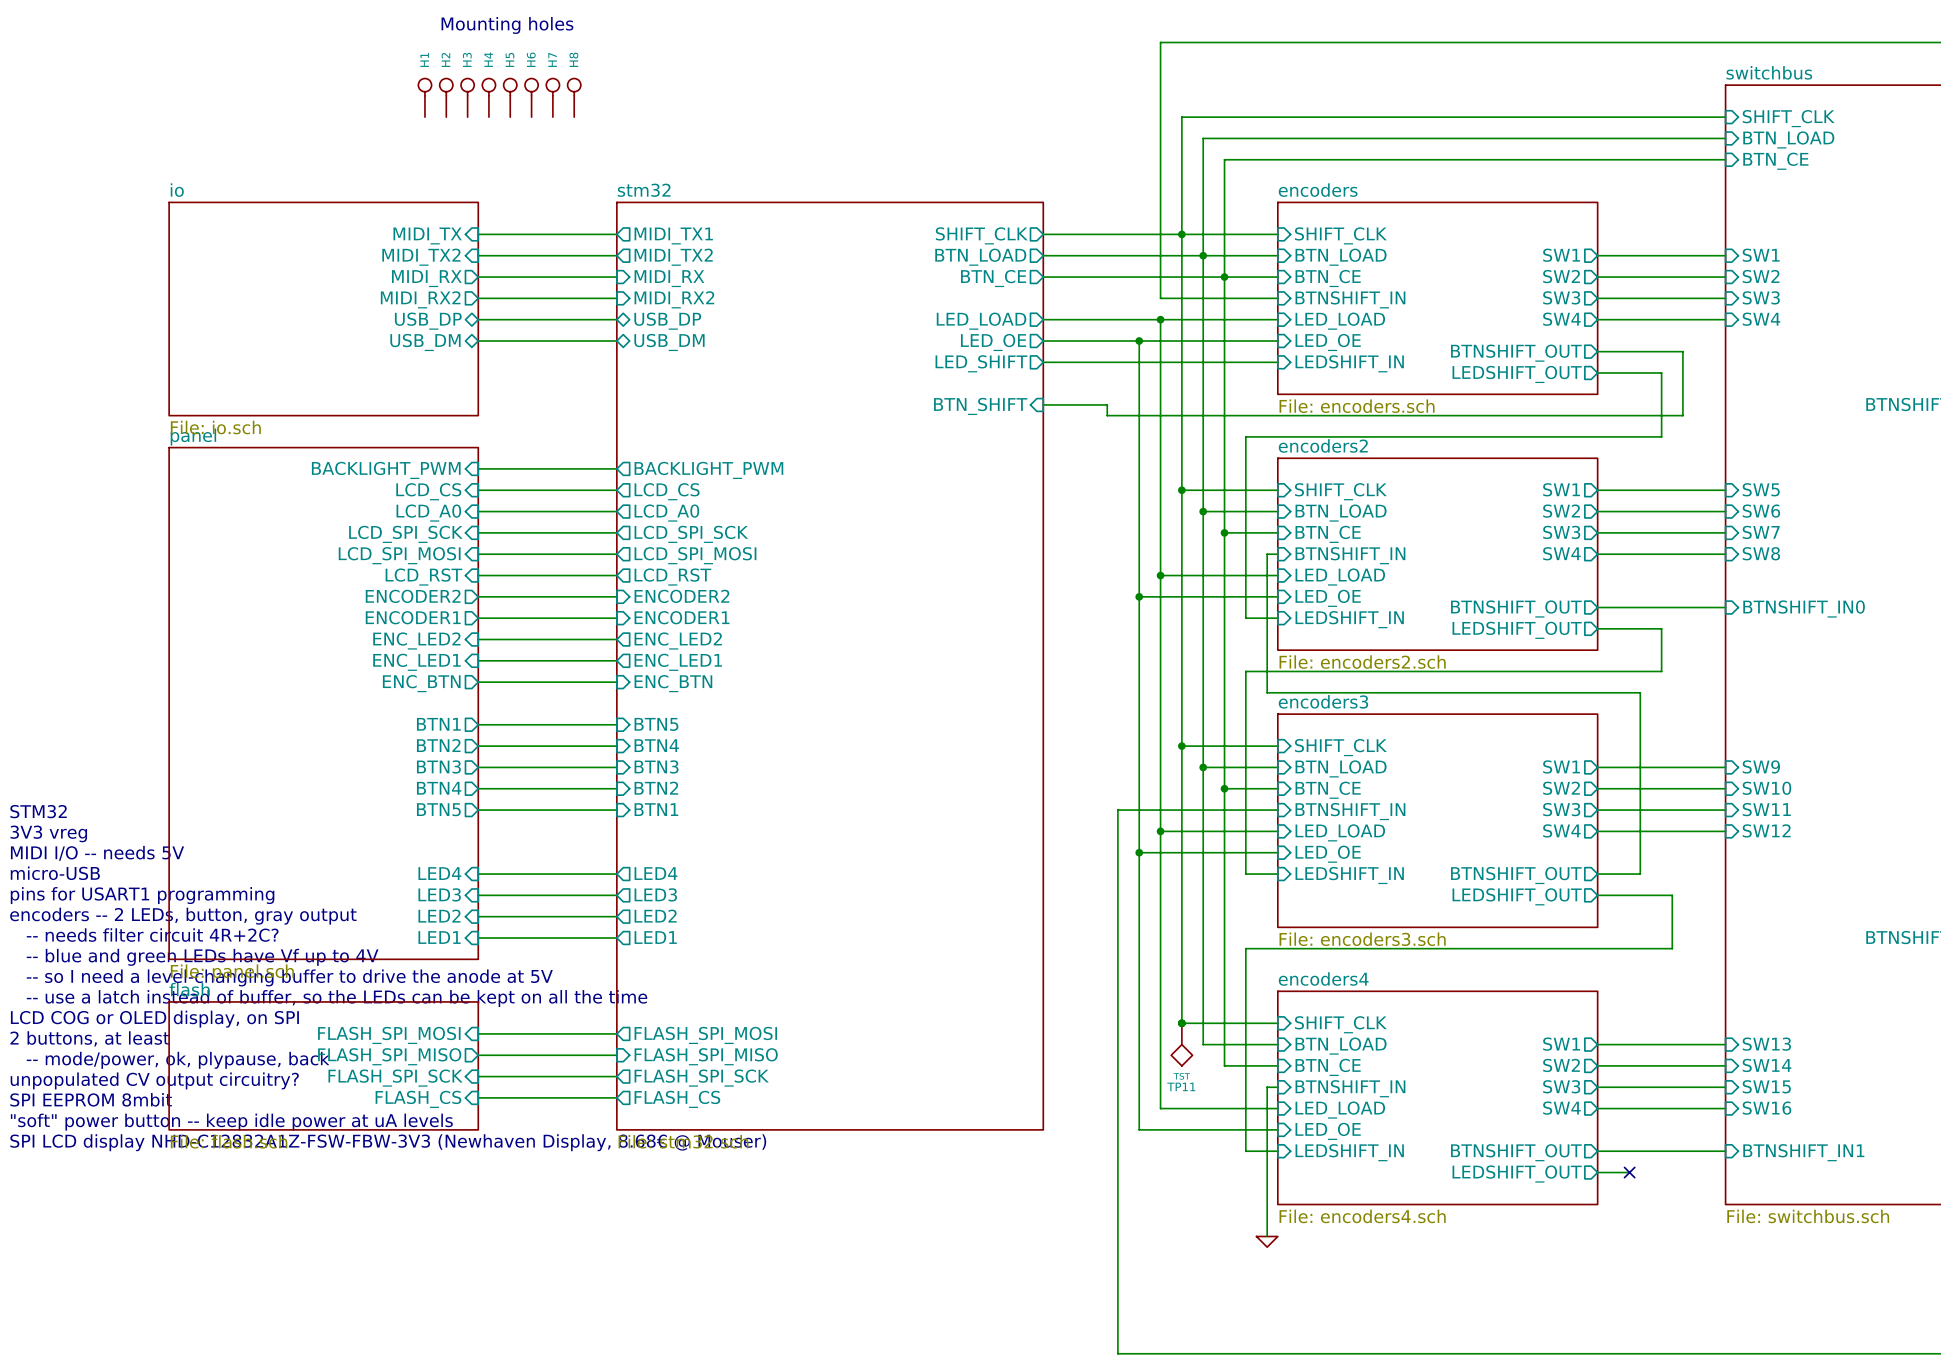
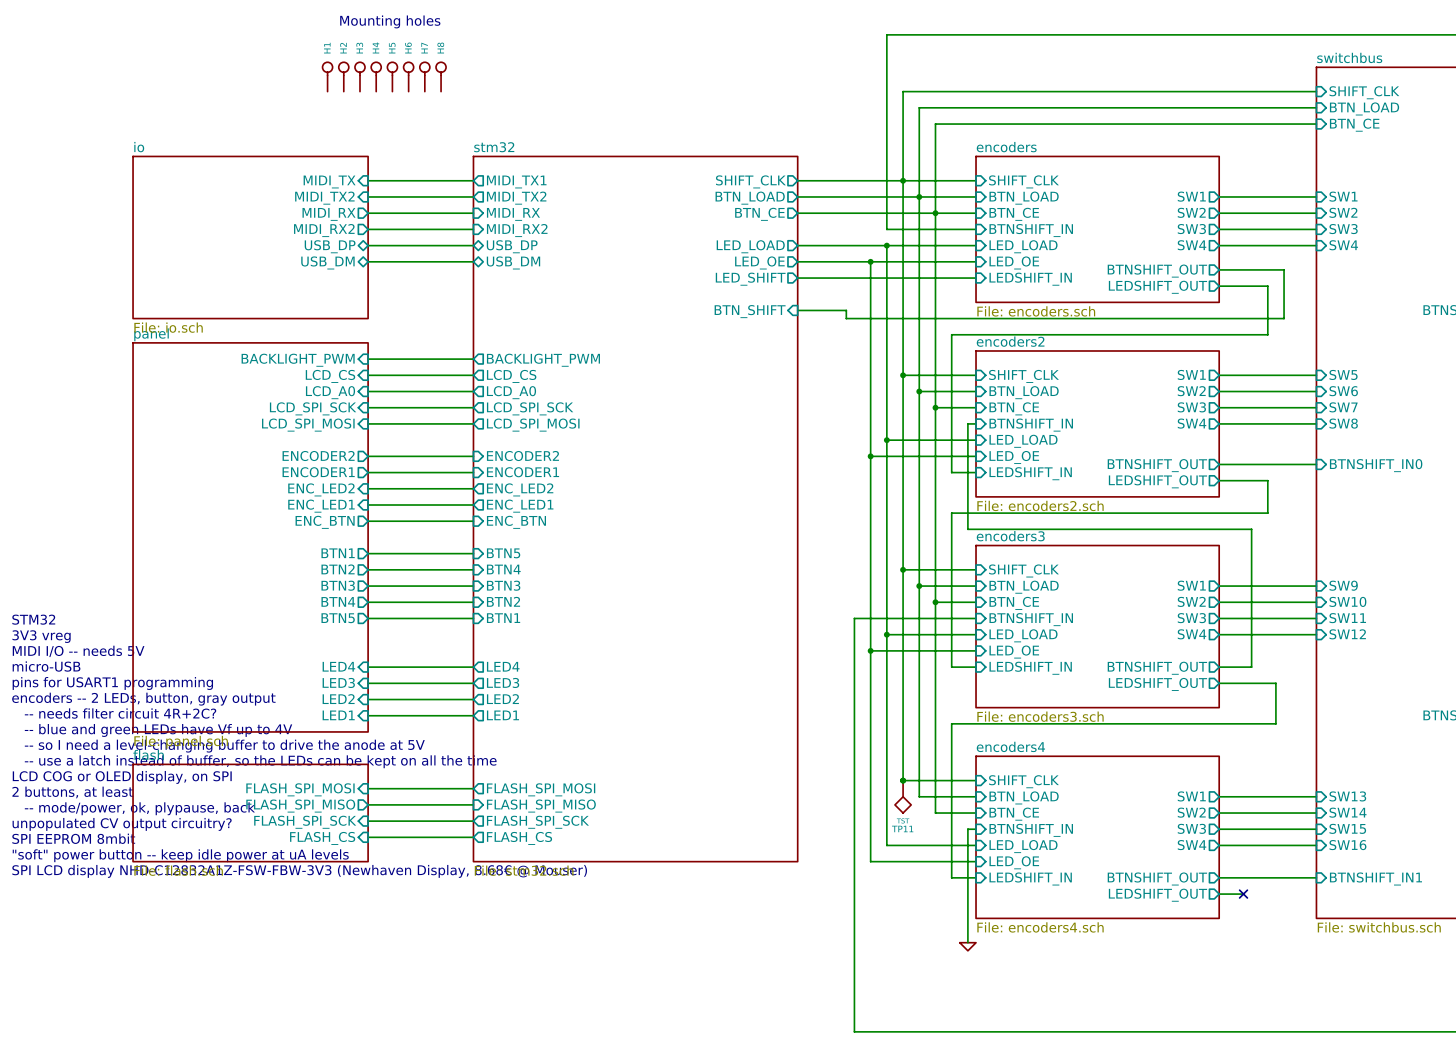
wire: (478, 575) (616, 575) -> none
sheet pin: LCD_RST (423, 577) -> none
sheet pin: LCD_RST (672, 577) -> none

